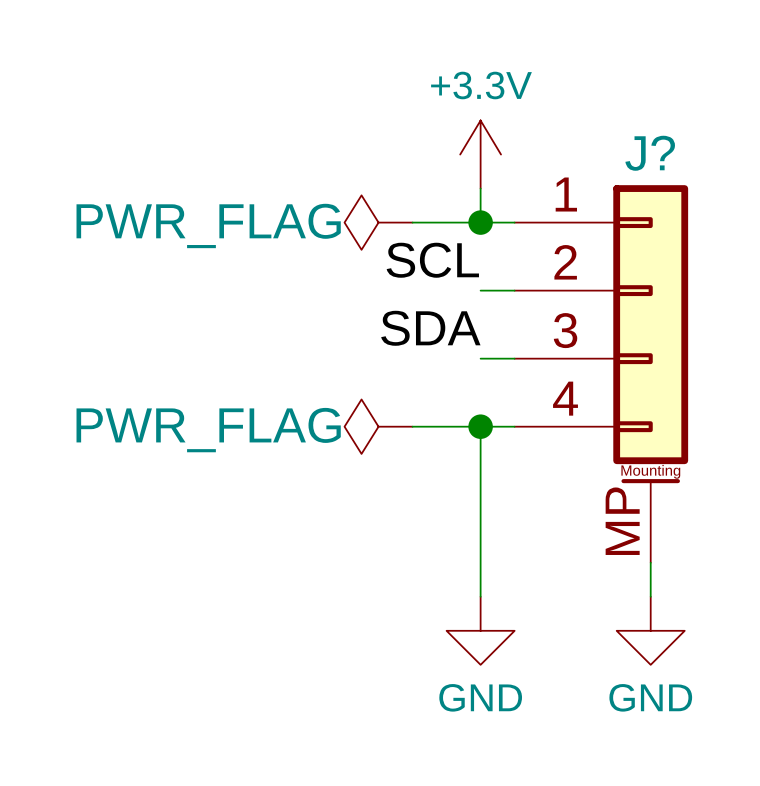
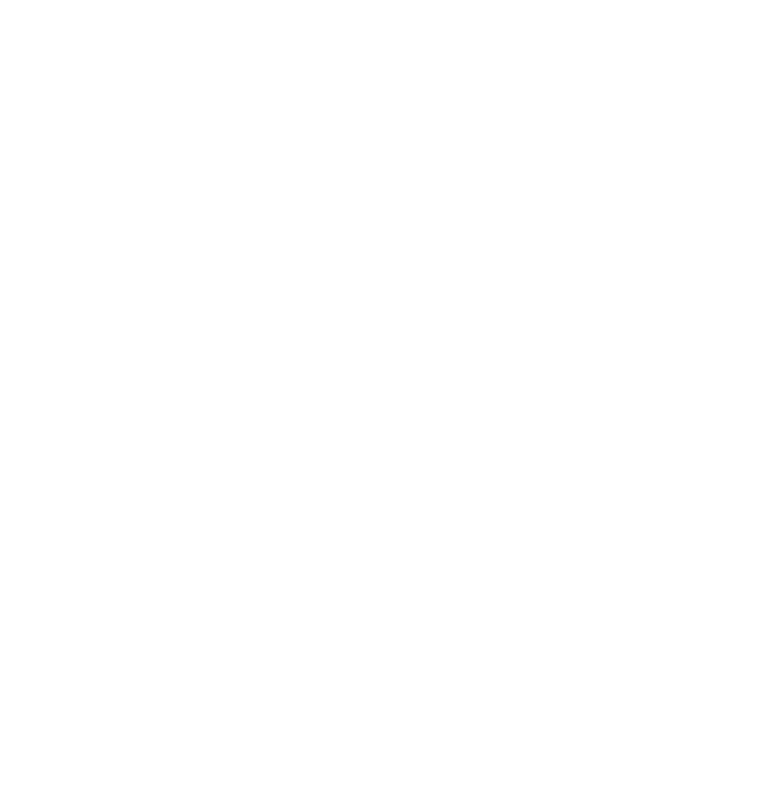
power symbol: +3.3V (480, 154) -> none
wire: (480, 188) (480, 222) -> none
power symbol: PWR_FLAG (378, 222) -> none
wire: (412, 222) (514, 222) -> none
junction: (480, 222) -> none
label: SCL (432, 260) -> none
wire: (480, 290) (514, 290) -> none
label: SDA (430, 328) -> none
wire: (480, 358) (514, 358) -> none
J?: (601, 373) -> none
power symbol: PWR_FLAG (378, 426) -> none
wire: (412, 426) (514, 426) -> none
wire: (480, 426) (480, 596) -> none
junction: (480, 426) -> none
wire: (650, 562) (650, 596) -> none
power symbol: GND (480, 630) -> none
power symbol: GND (650, 630) -> none

